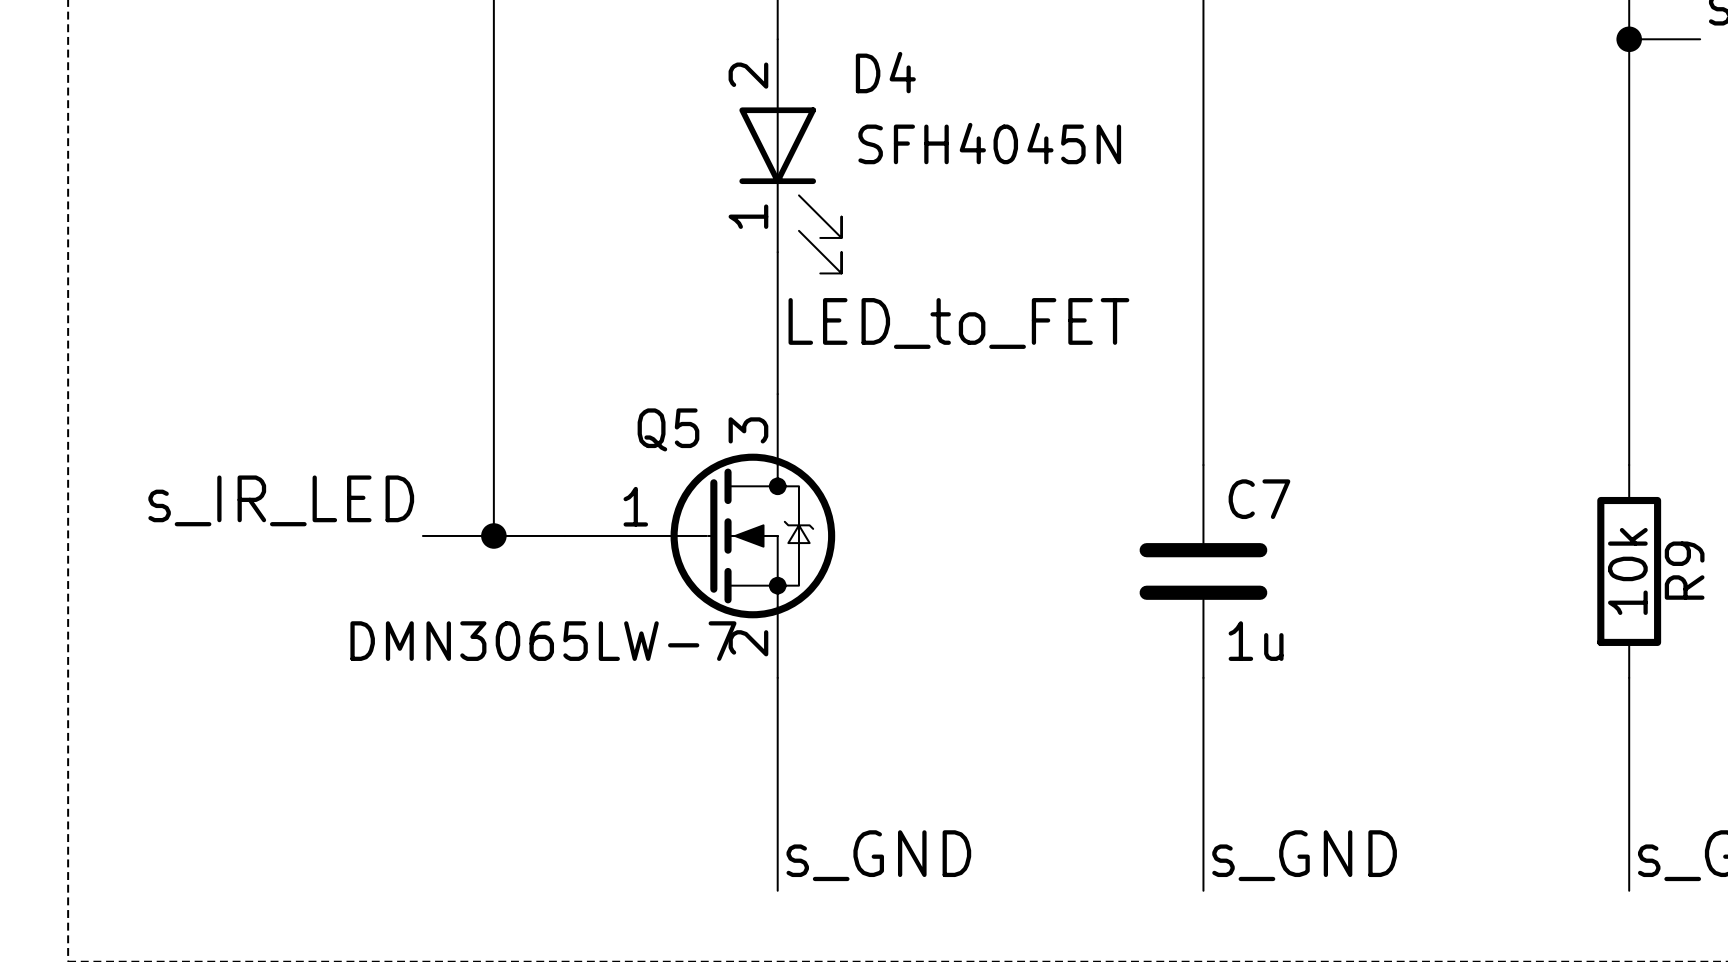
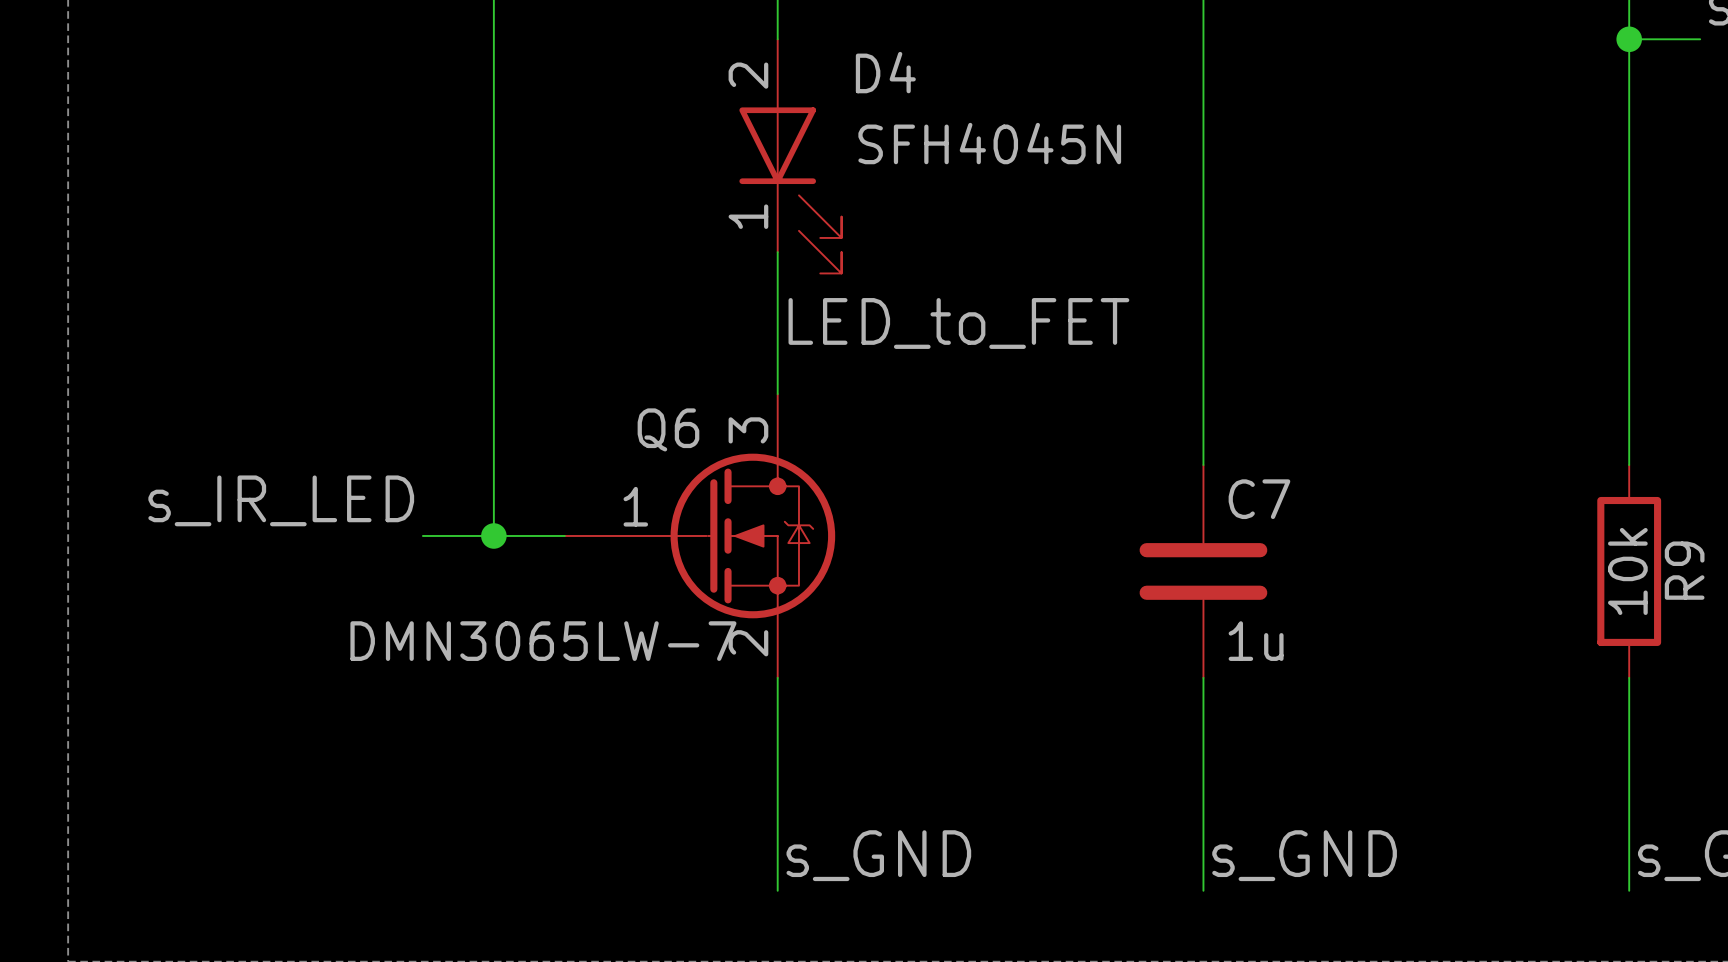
Q5 name: Q5 (668, 429) -> Q6 (668, 429)

